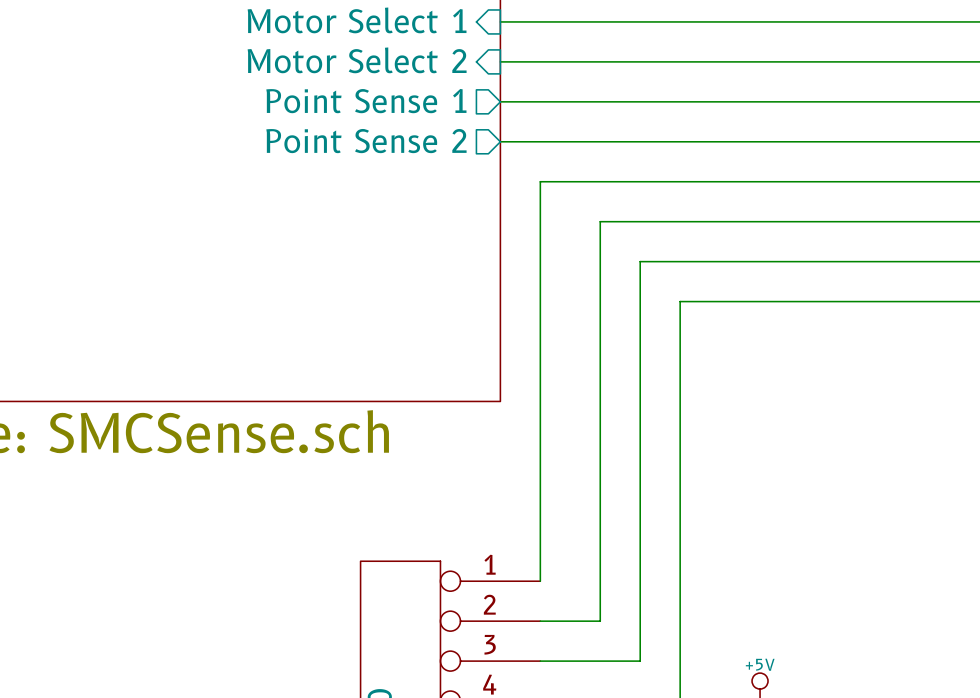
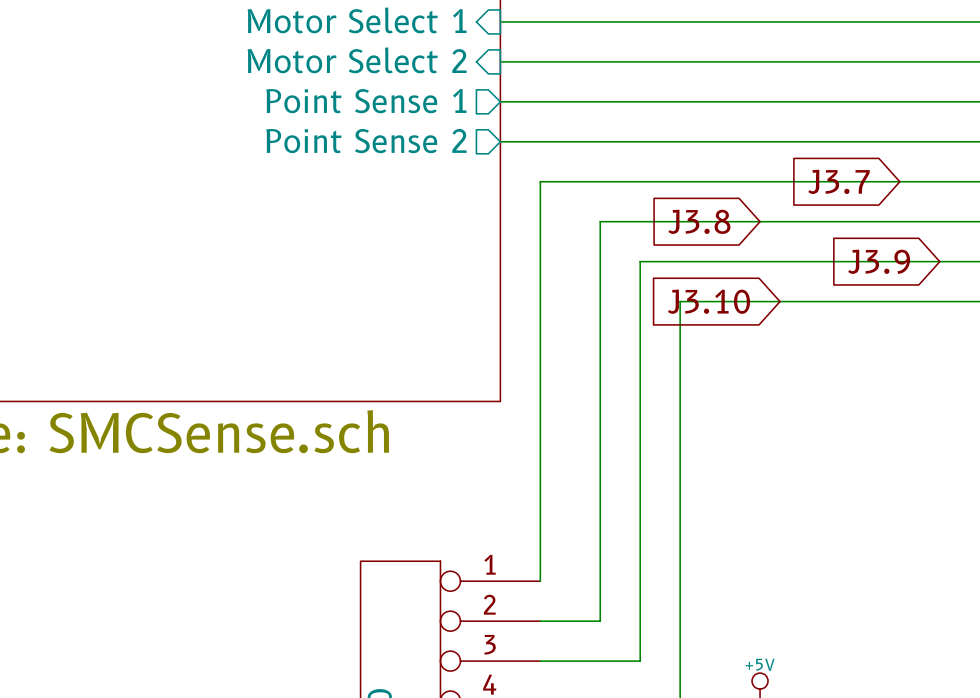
global label: none -> J3.7 (838, 181)
global label: none -> J3.8 (699, 221)
global label: none -> J3.9 (879, 261)
global label: none -> J3.10 (708, 301)

